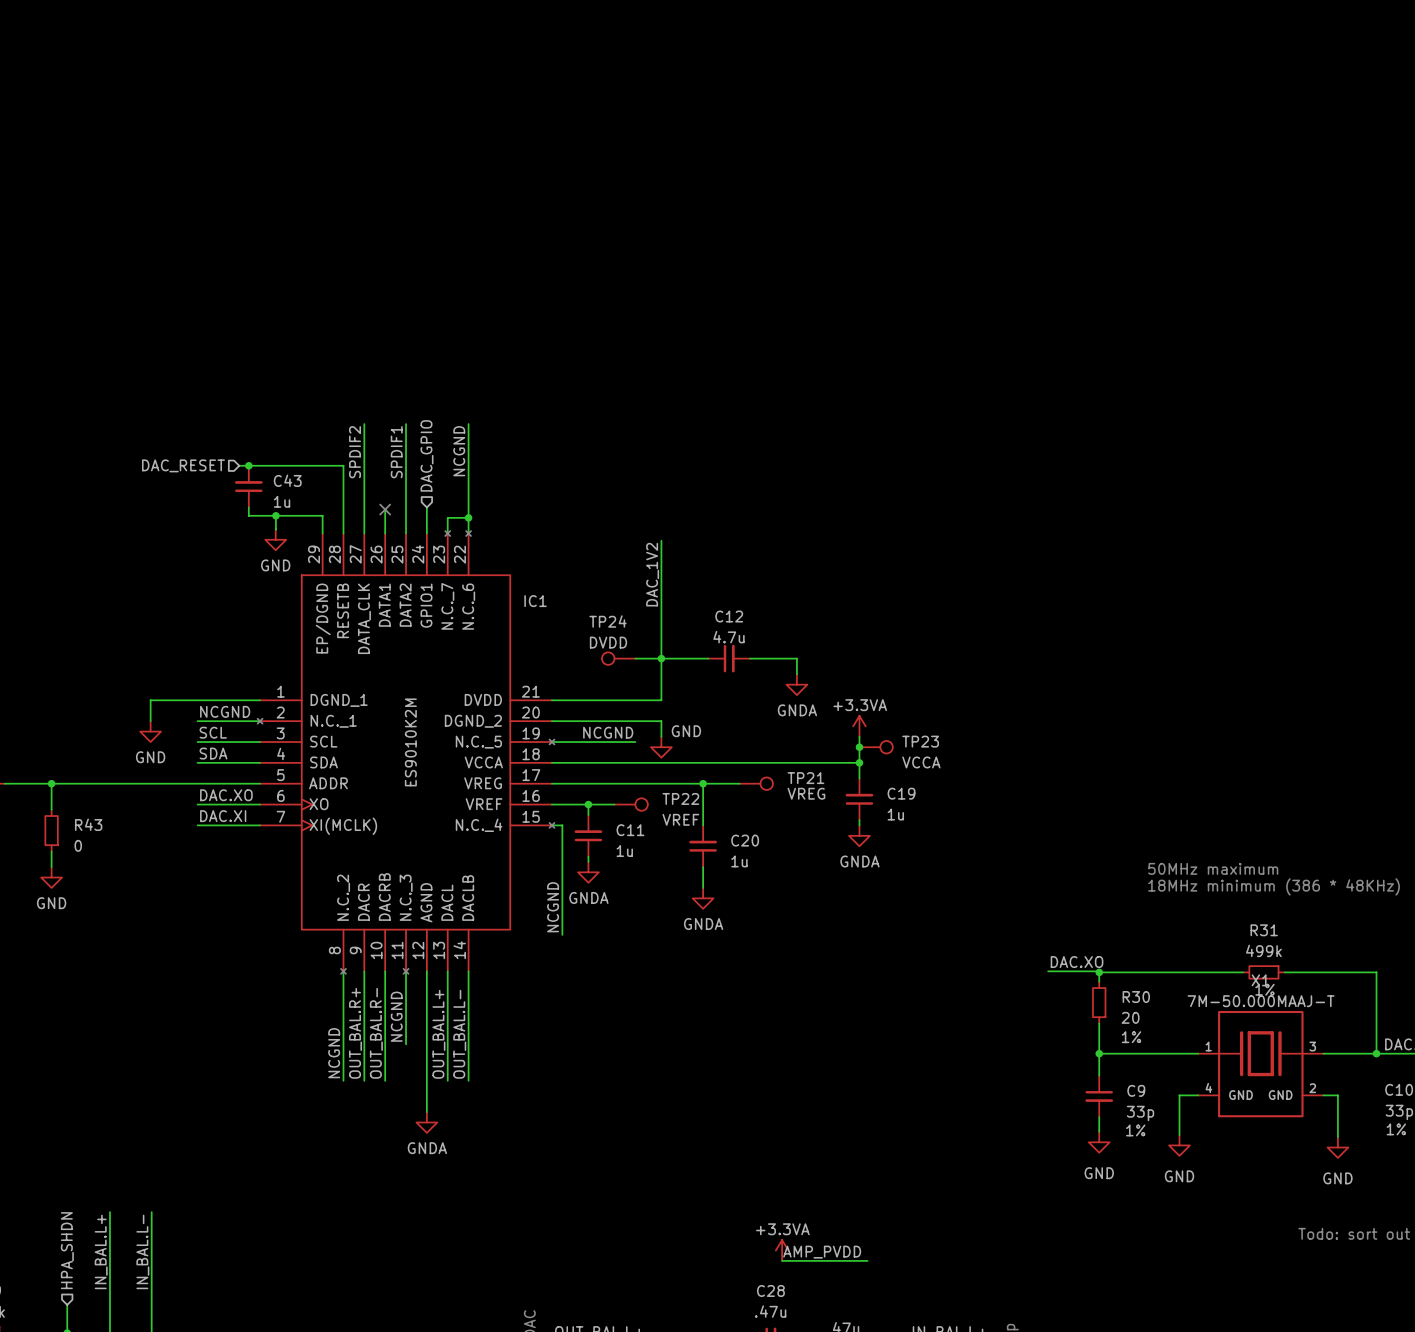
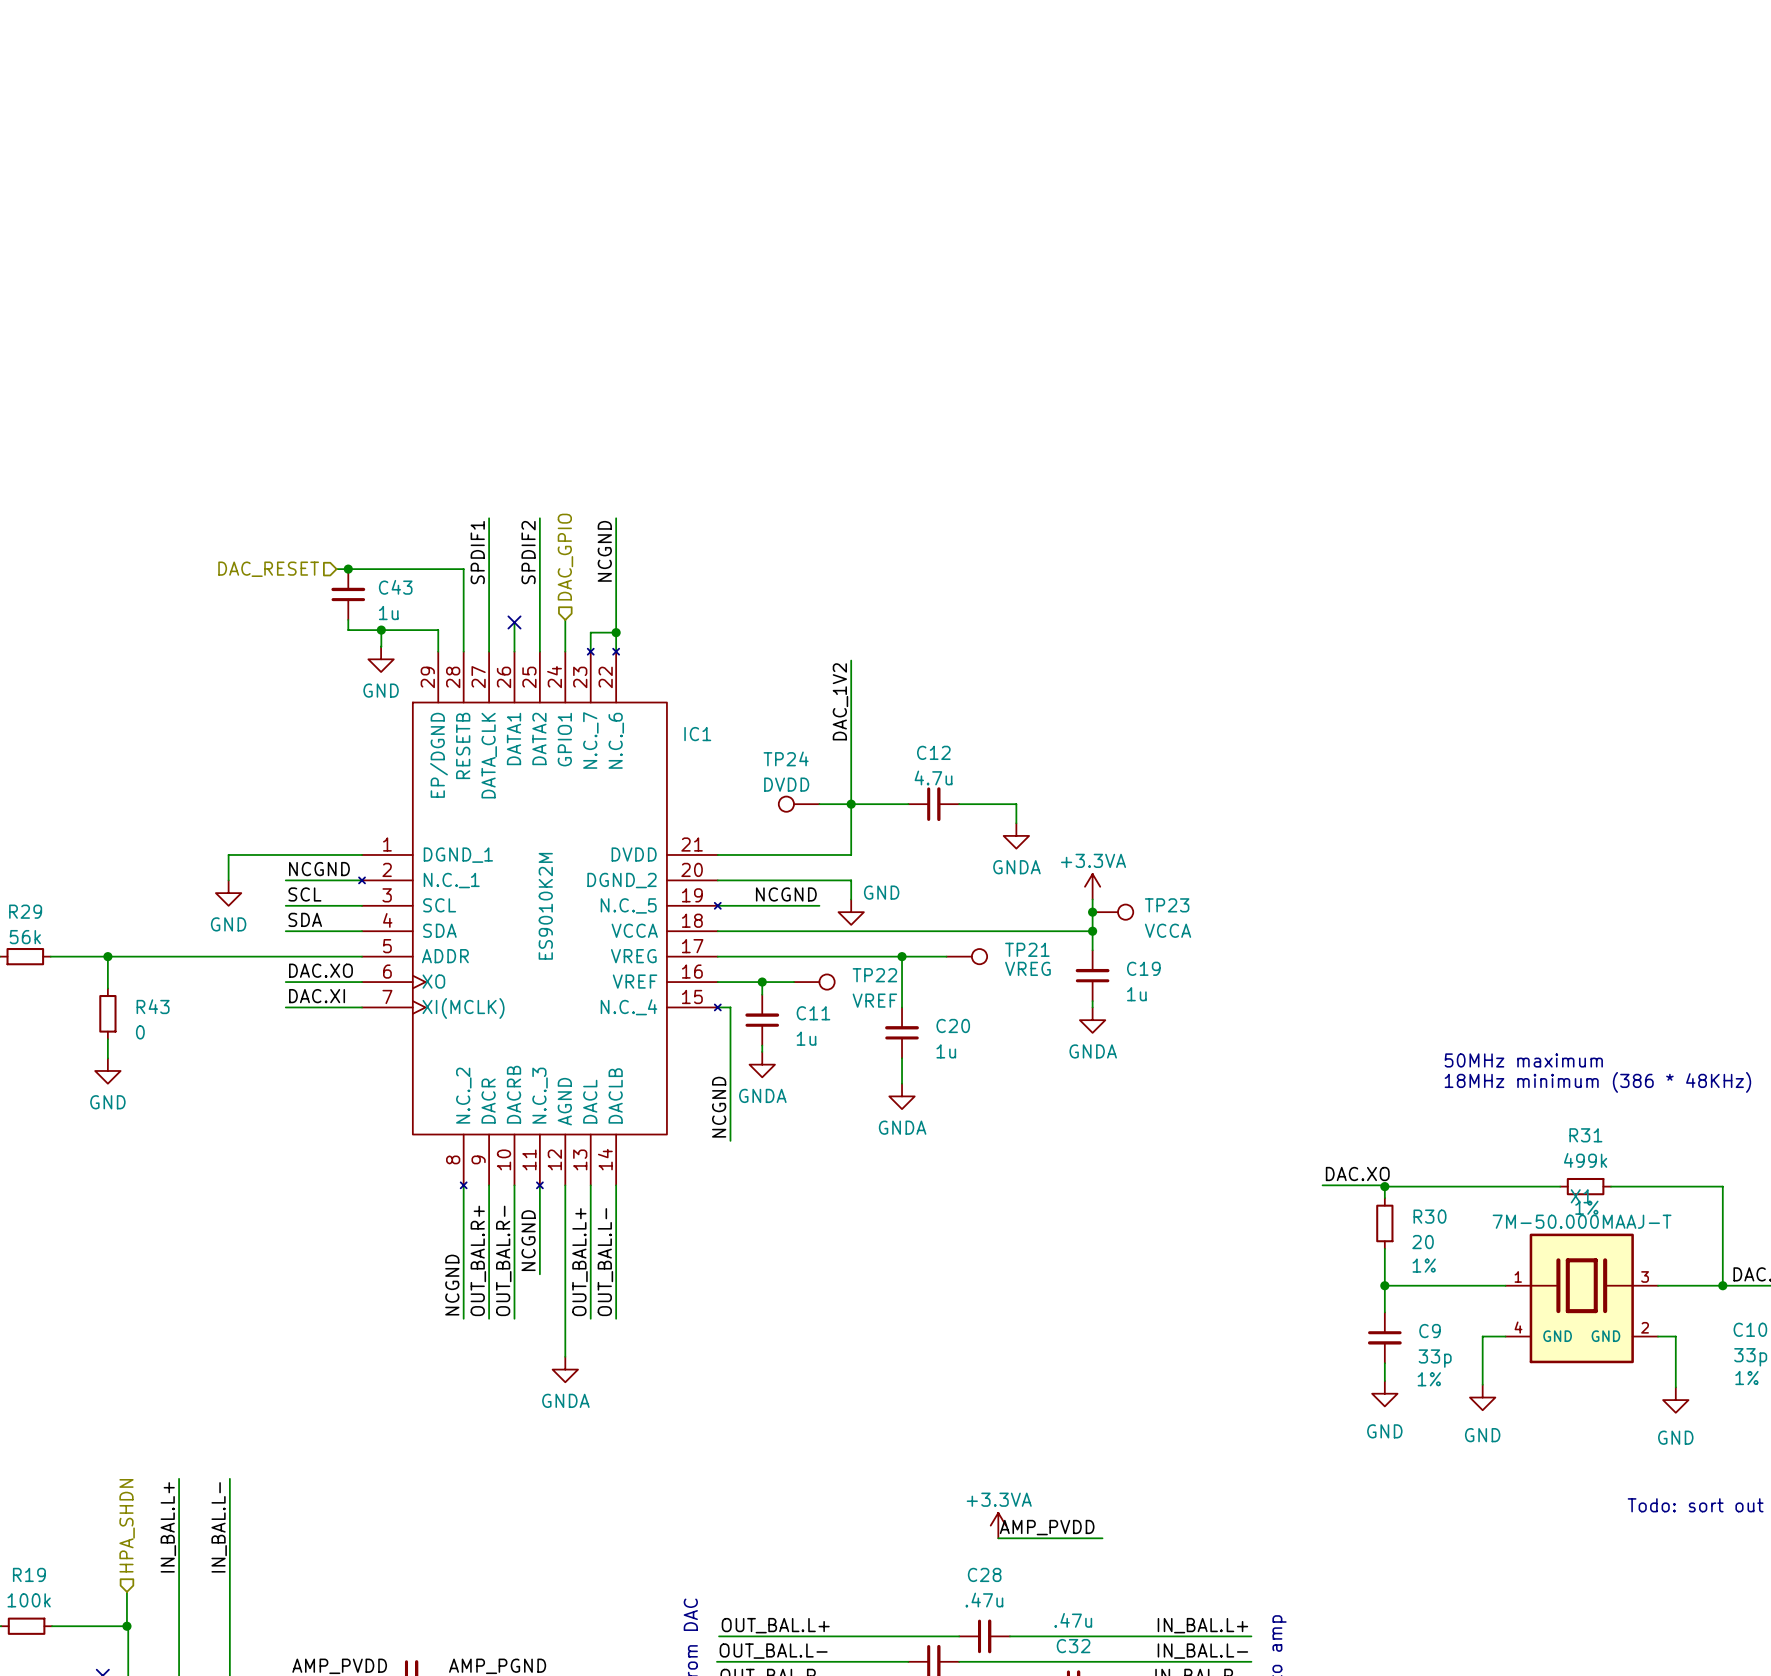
label: SPDIF2 (355, 452) -> SPDIF1 (477, 552)
label: SPDIF1 (396, 452) -> SPDIF2 (528, 552)

